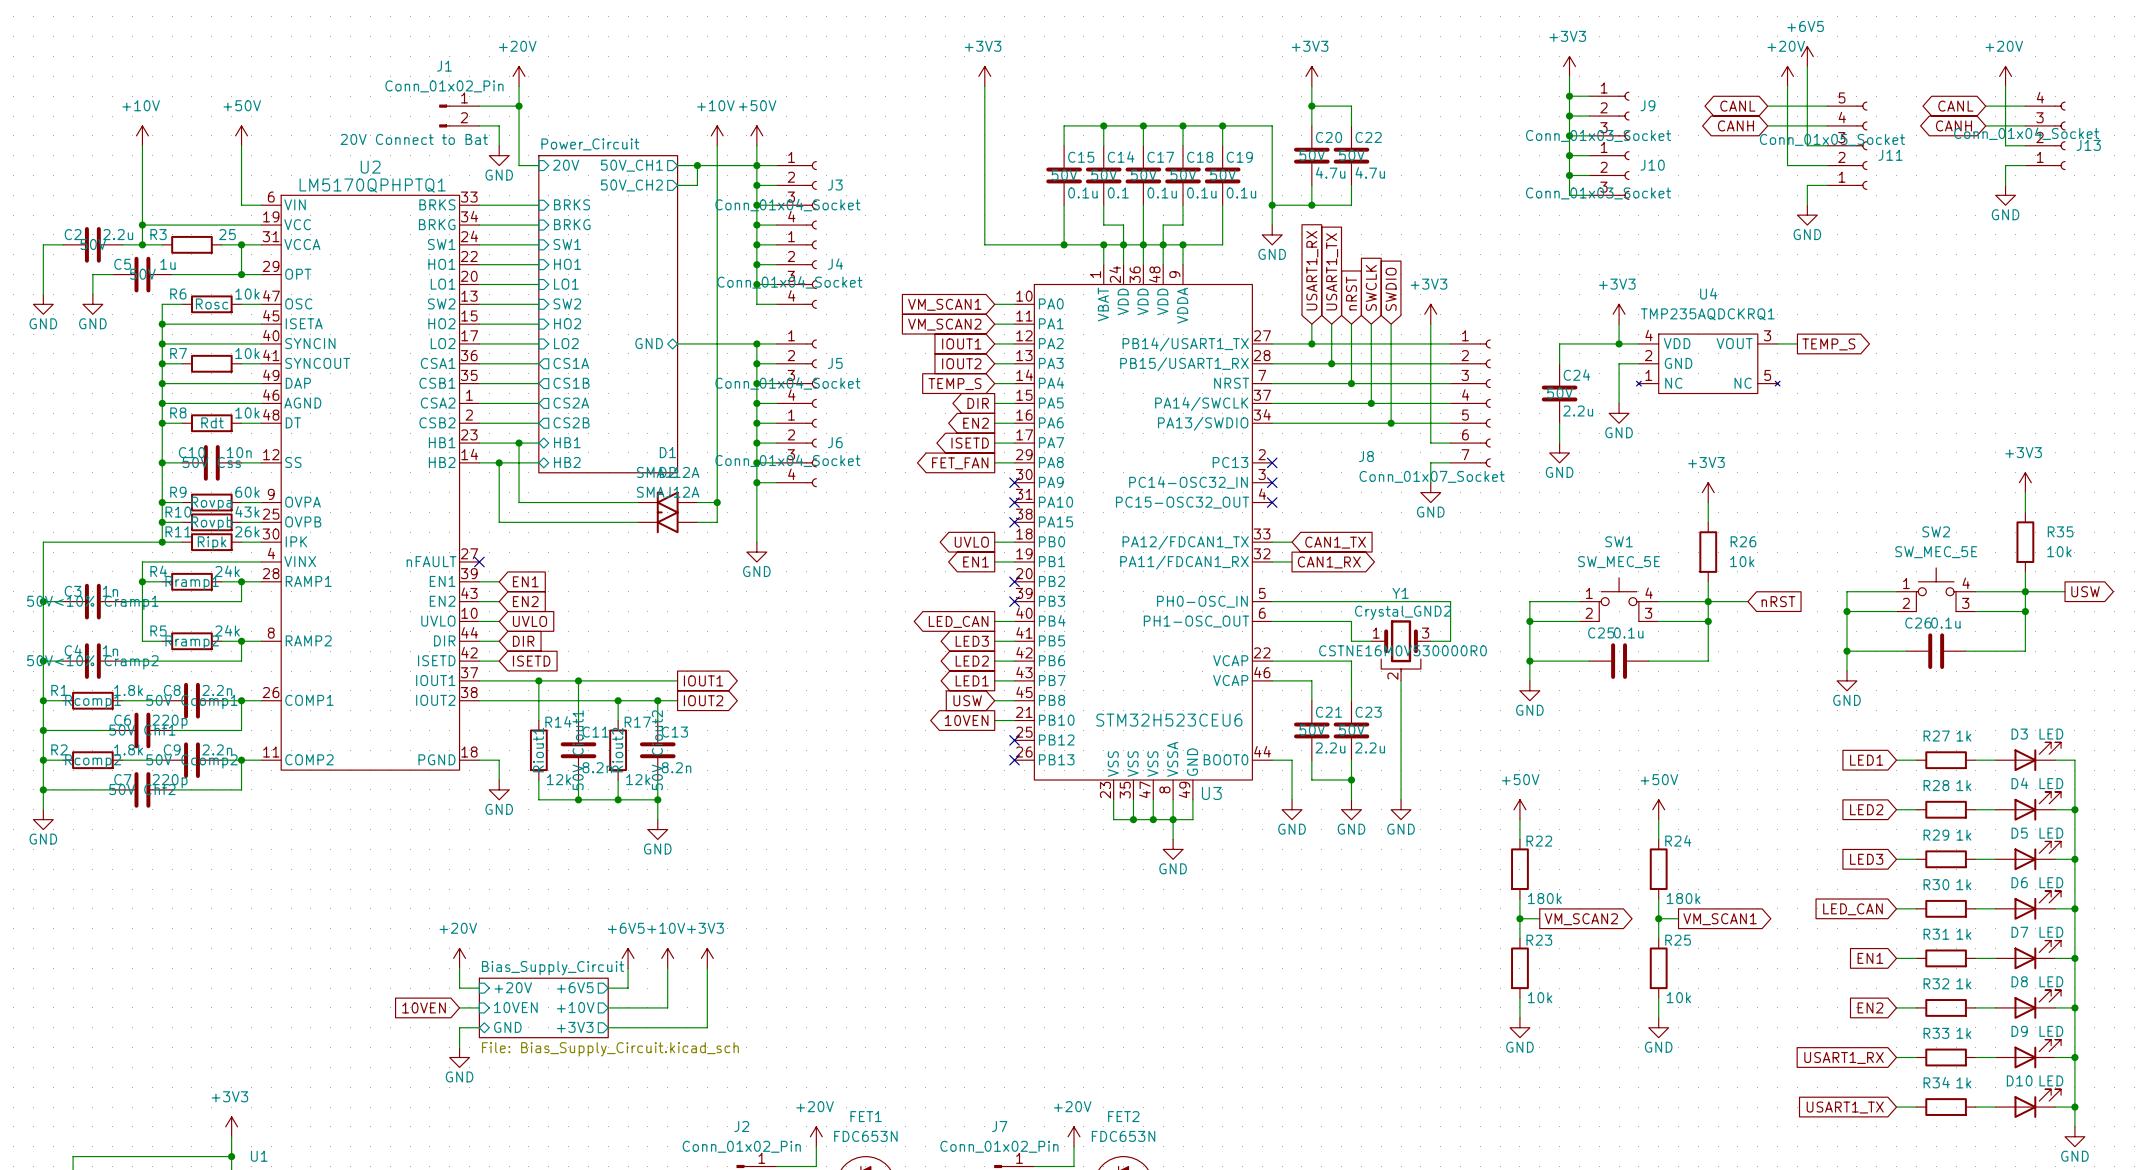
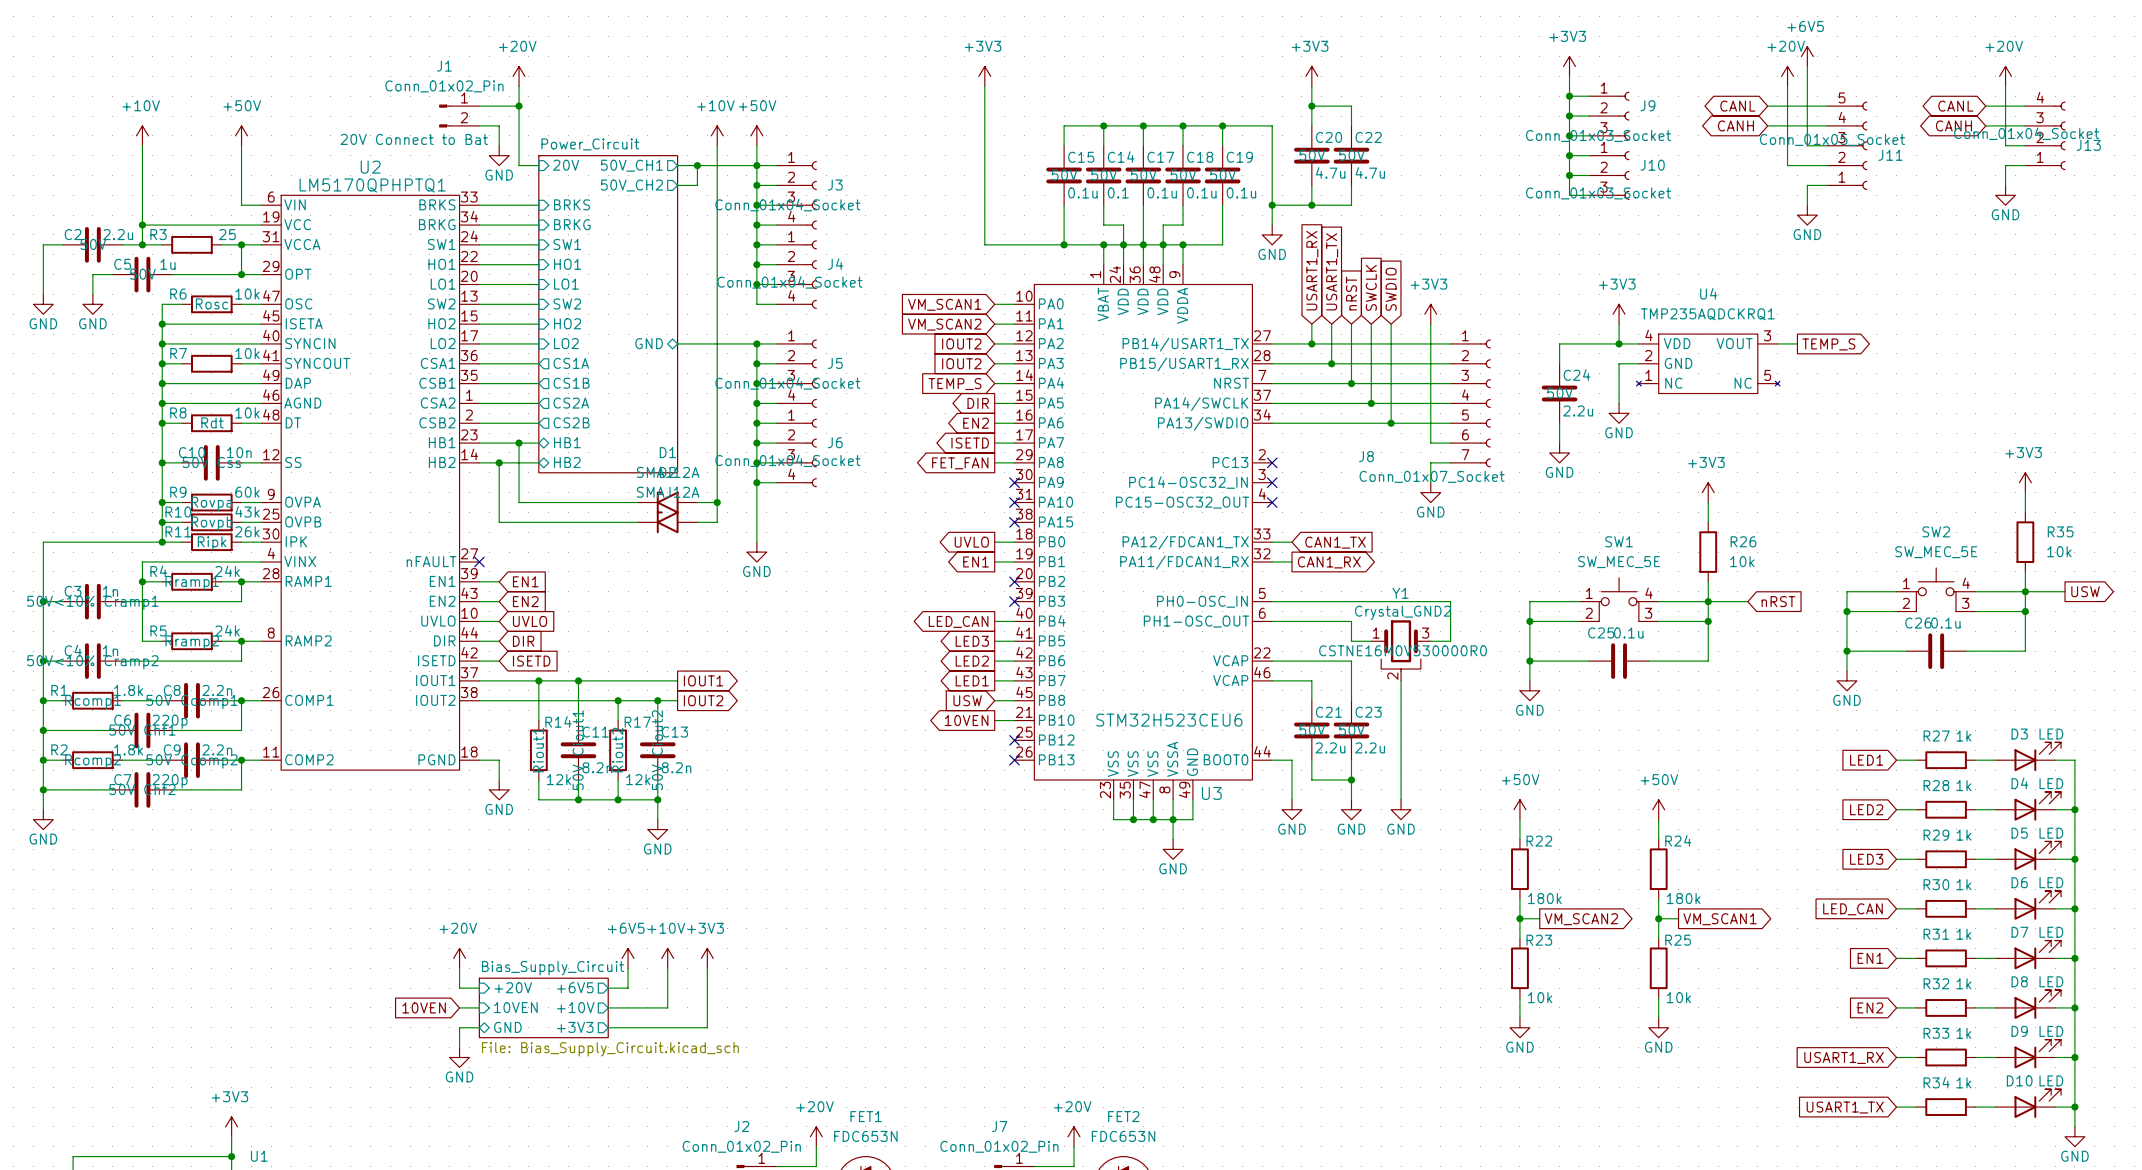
global label: IOUT1 (961, 343) -> IOUT2 (961, 343)

